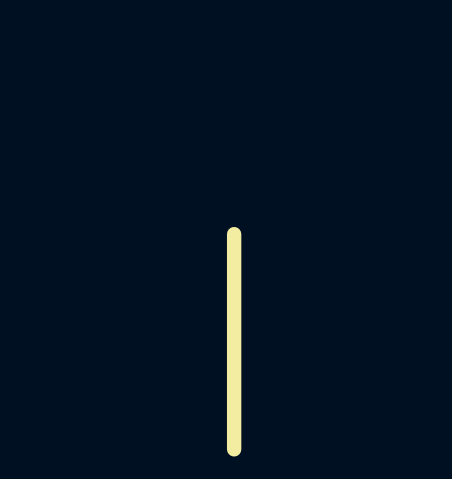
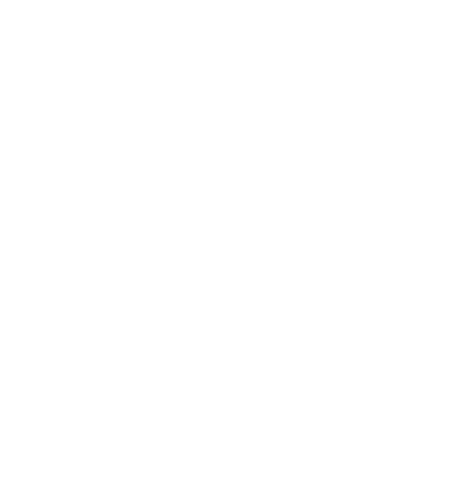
line: (234, 234) (234, 449) -> none

